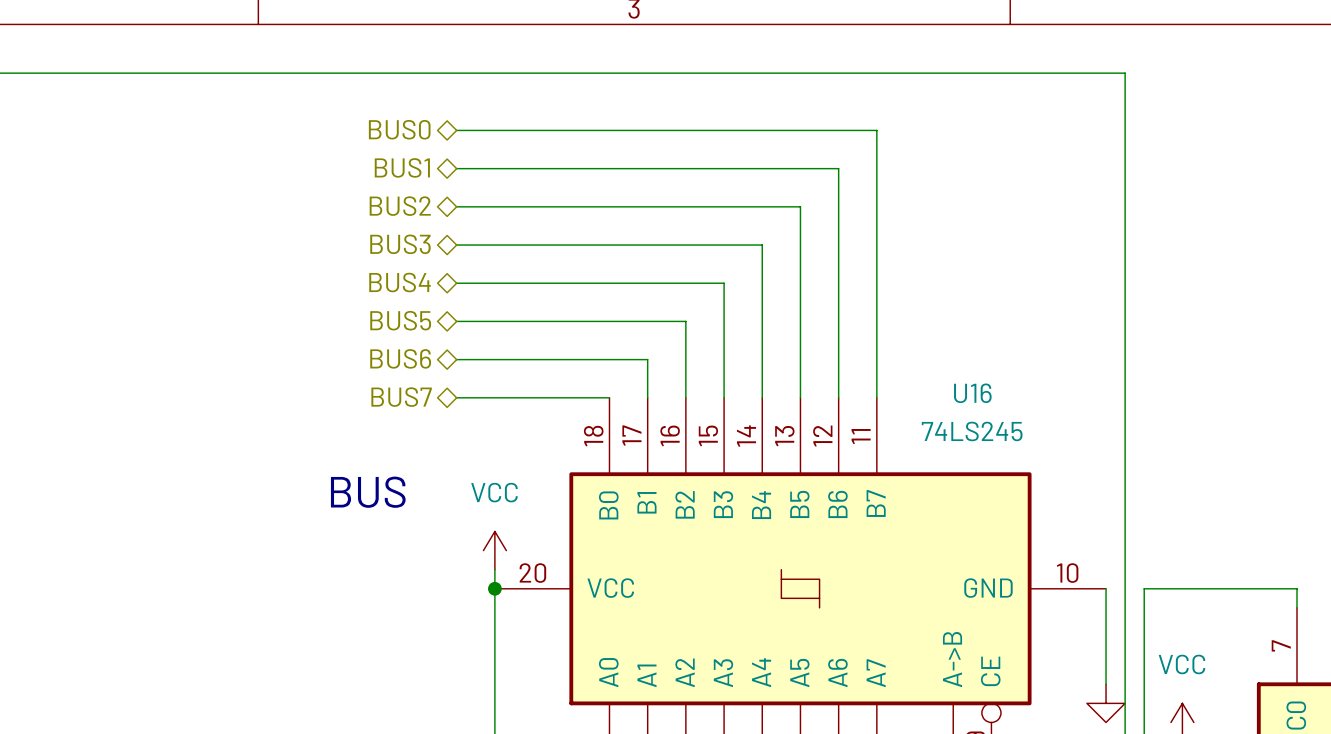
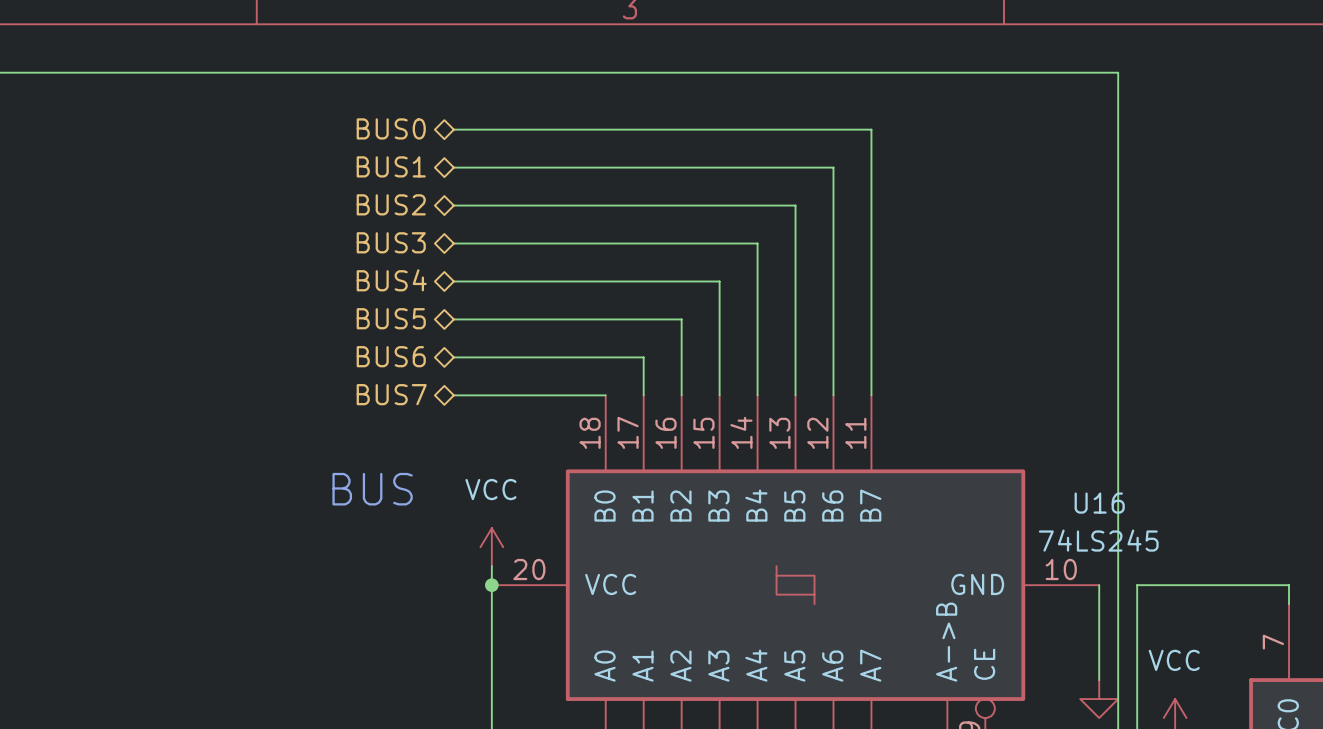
U16 name position: U16 (972, 393) -> U16 (1099, 503)
U16 value position: 74LS245 (972, 431) -> 74LS245 (1098, 540)

